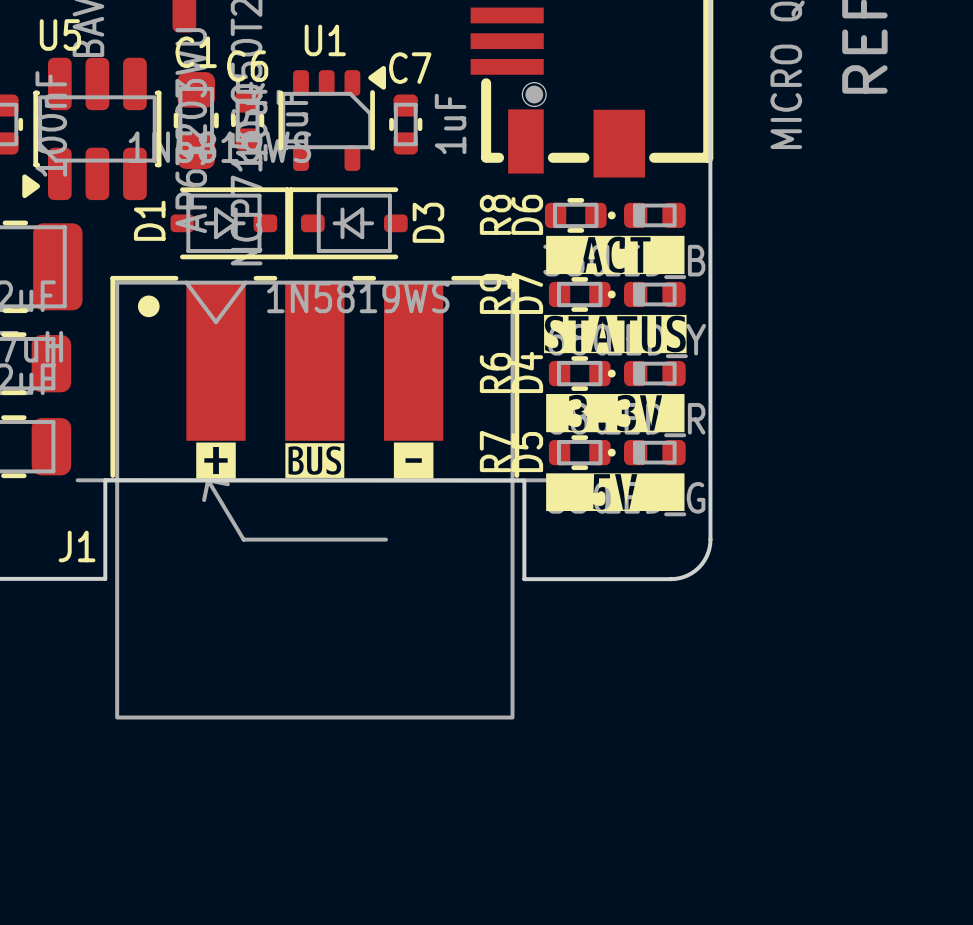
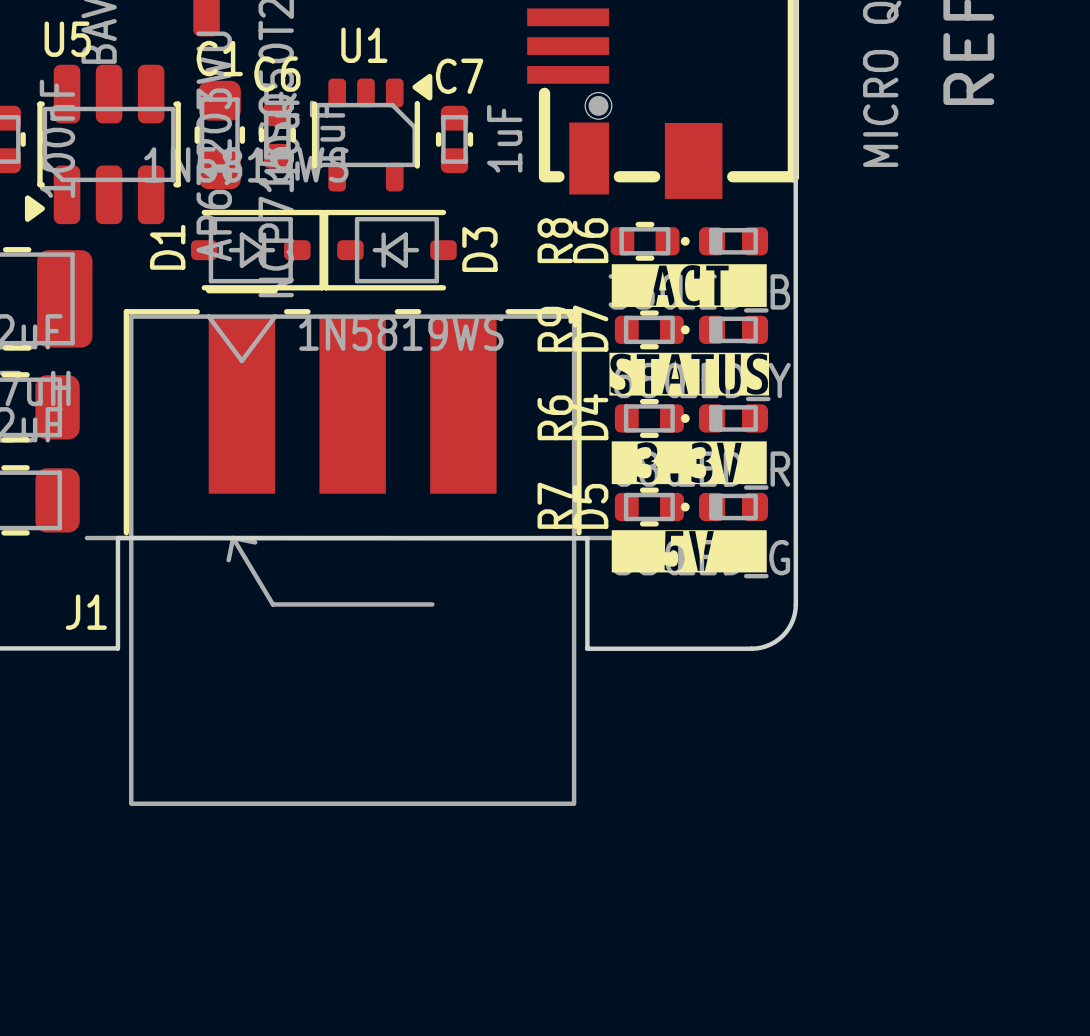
J1 footprint: [75, 275, 555, 720] -> [84, 288, 621, 806]
drawing: [196, 442, 236, 479] -> none
drawing: [393, 442, 434, 479] -> none
drawing: [285, 443, 345, 478] -> none

